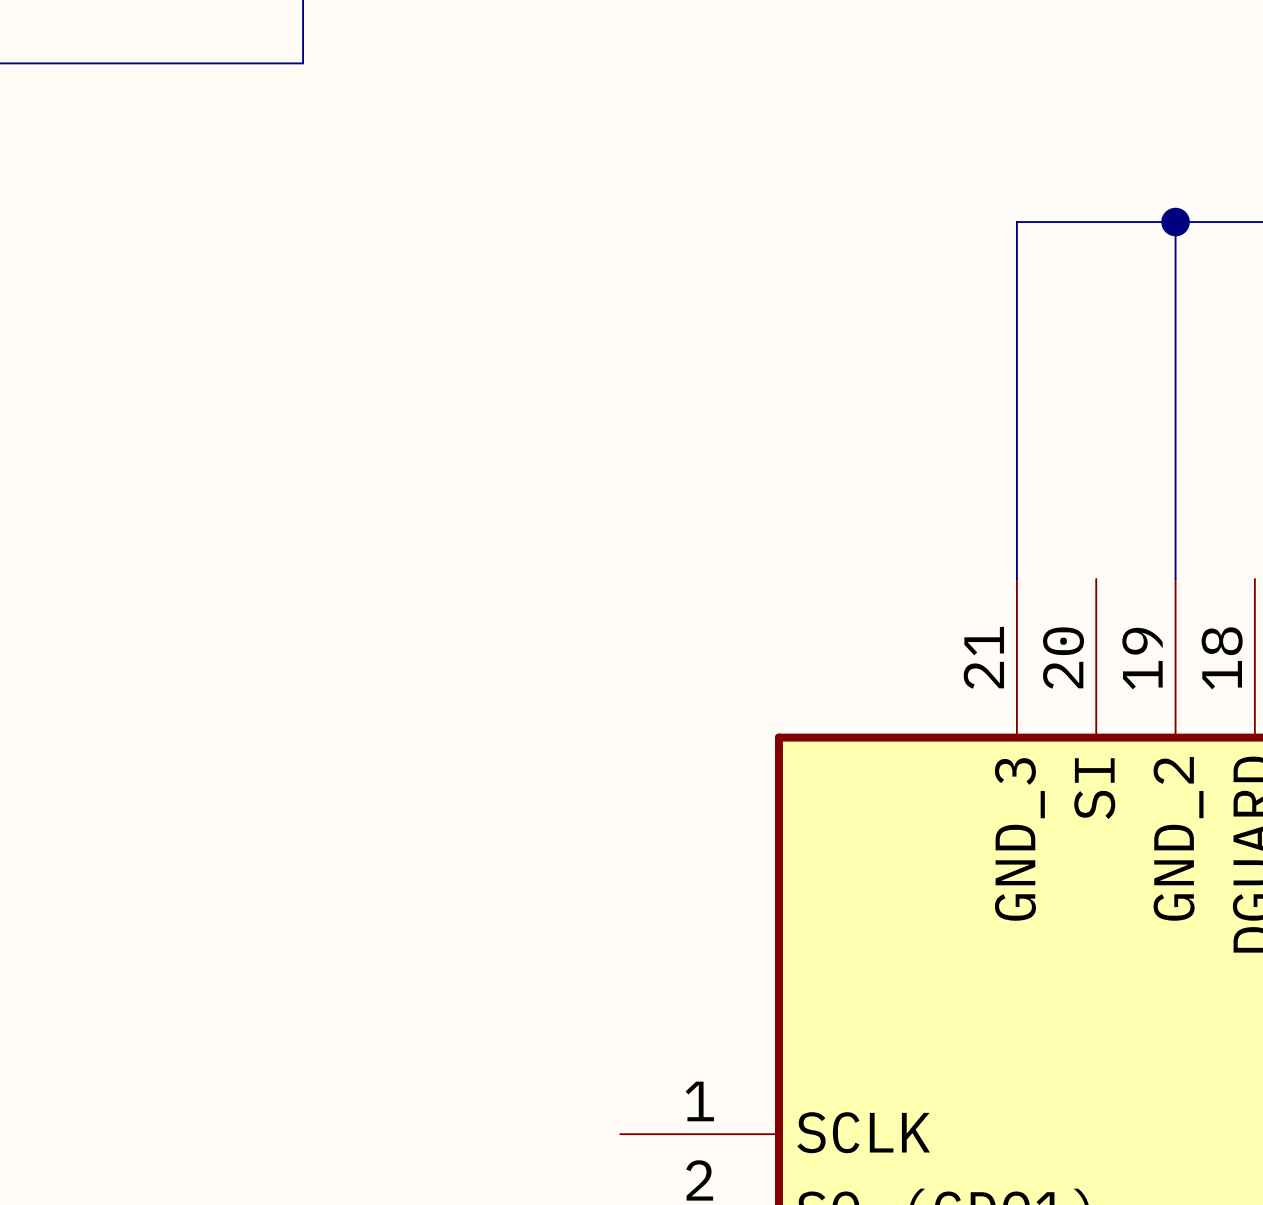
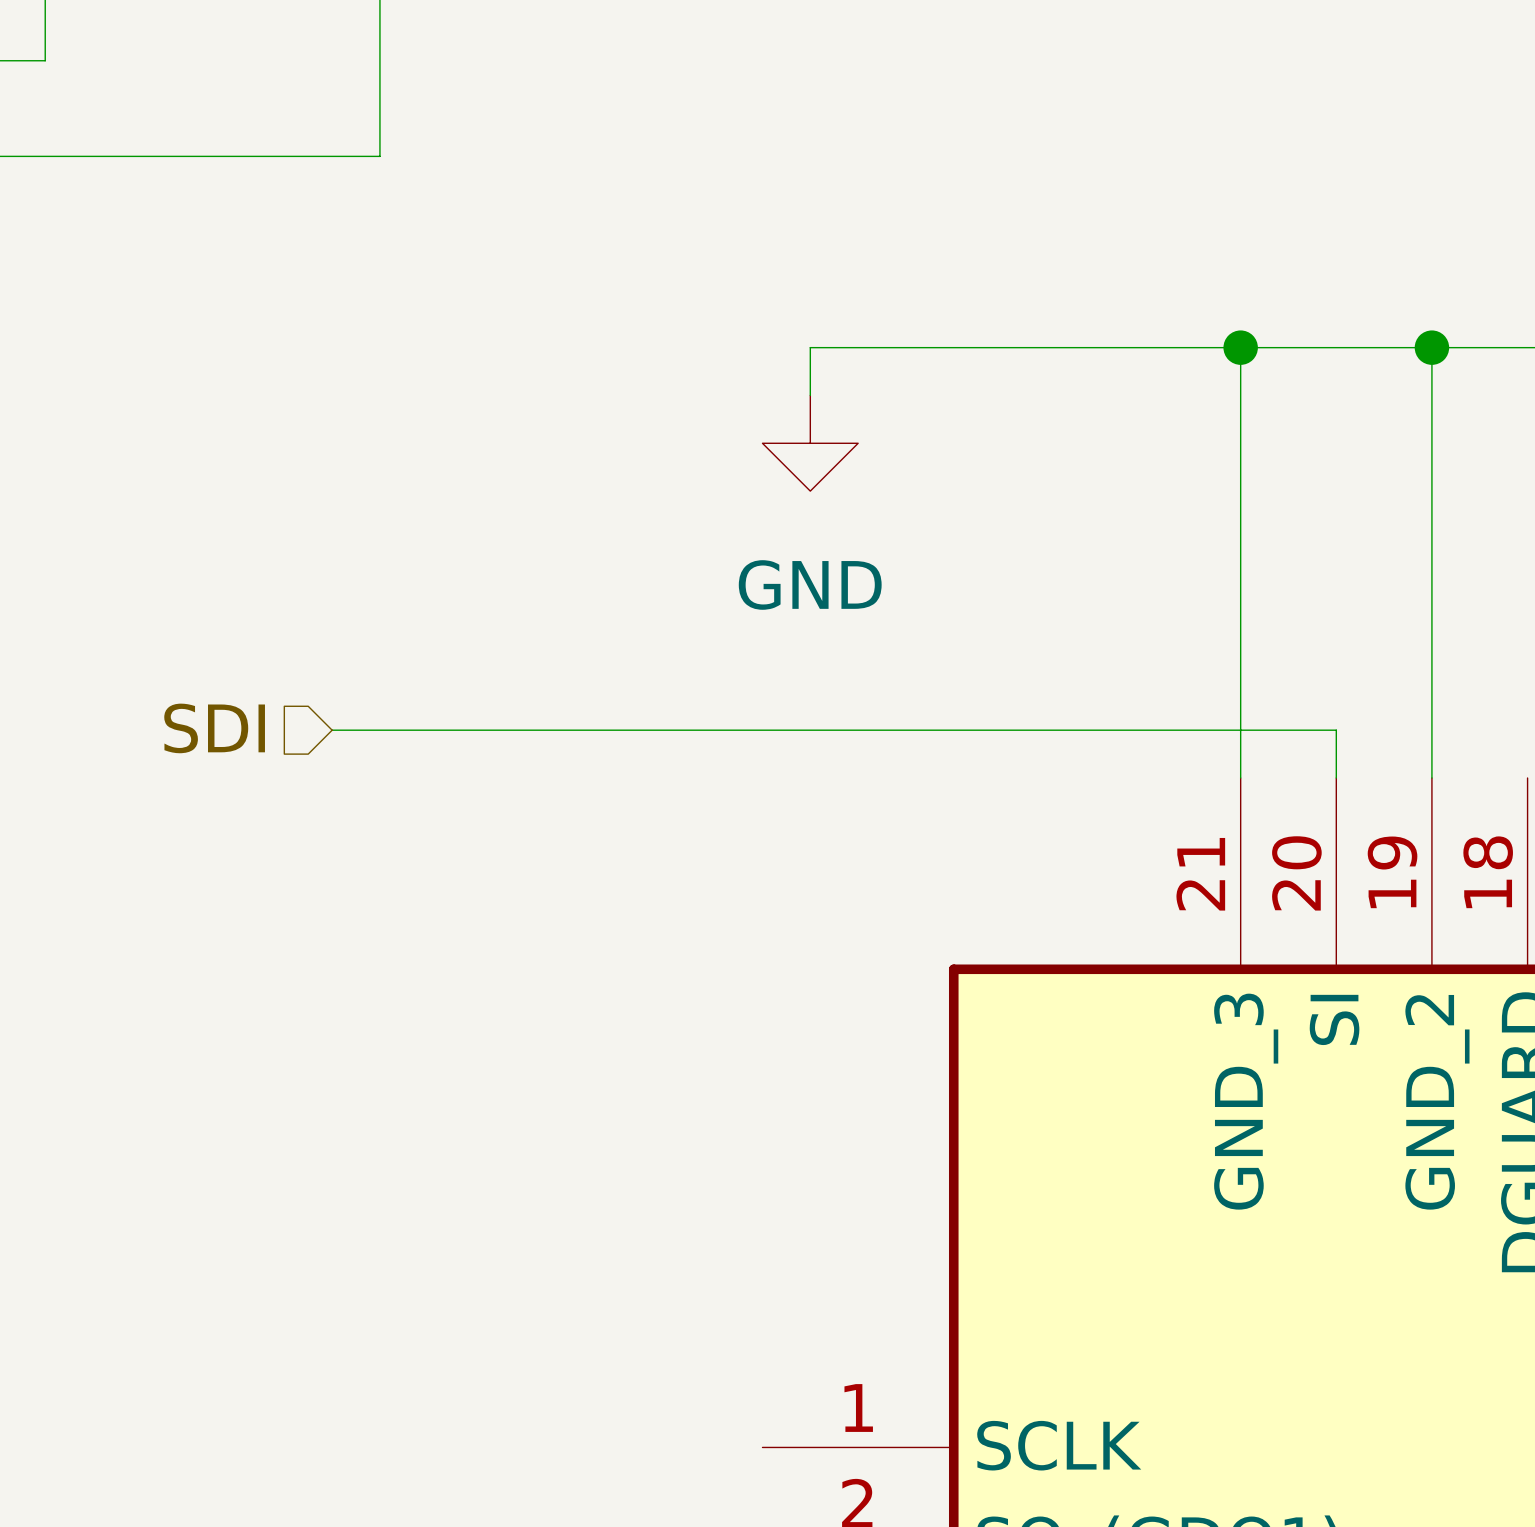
wire: none -> (1240, 347) (810, 347) (810, 395)
junction: none -> (1240, 347)
power symbol: none -> GND (810, 443)
hierarchical label: none -> SDI (214, 728)
wire: none -> (332, 730) (1336, 730) (1336, 778)

